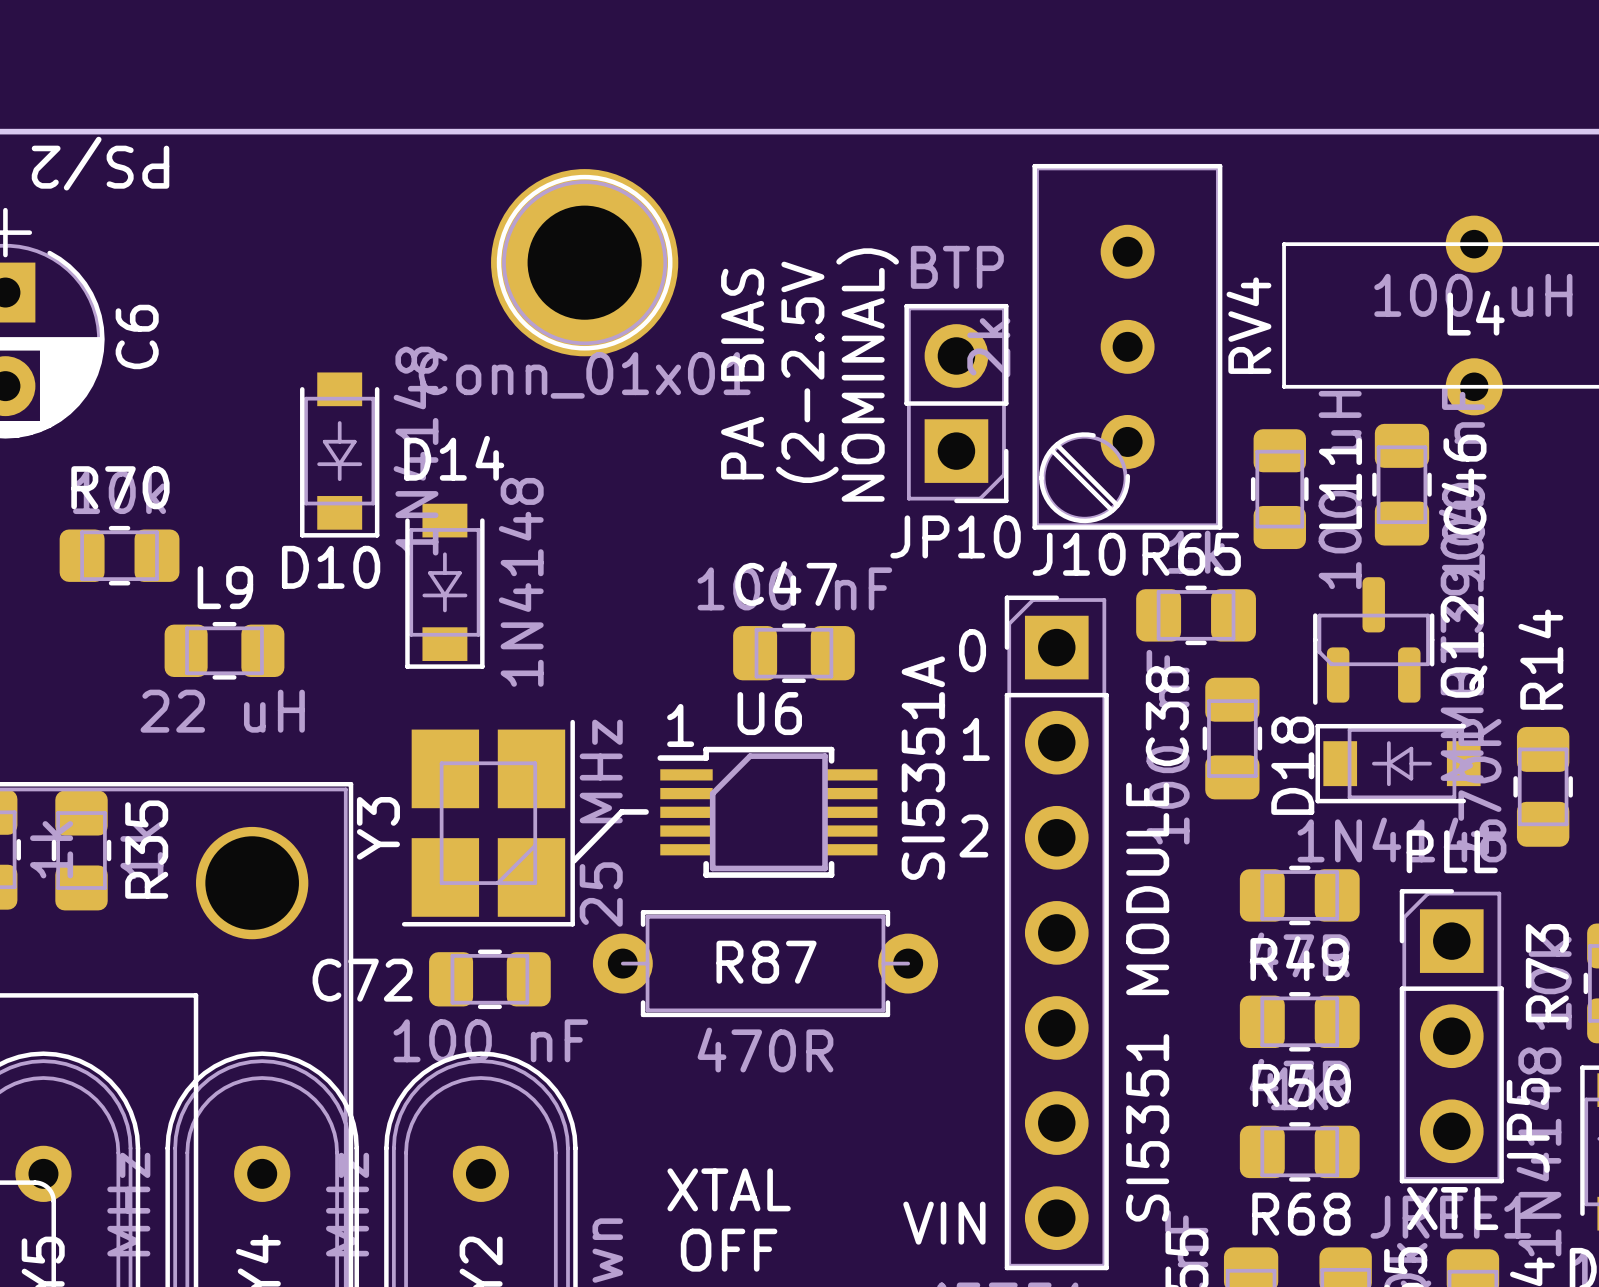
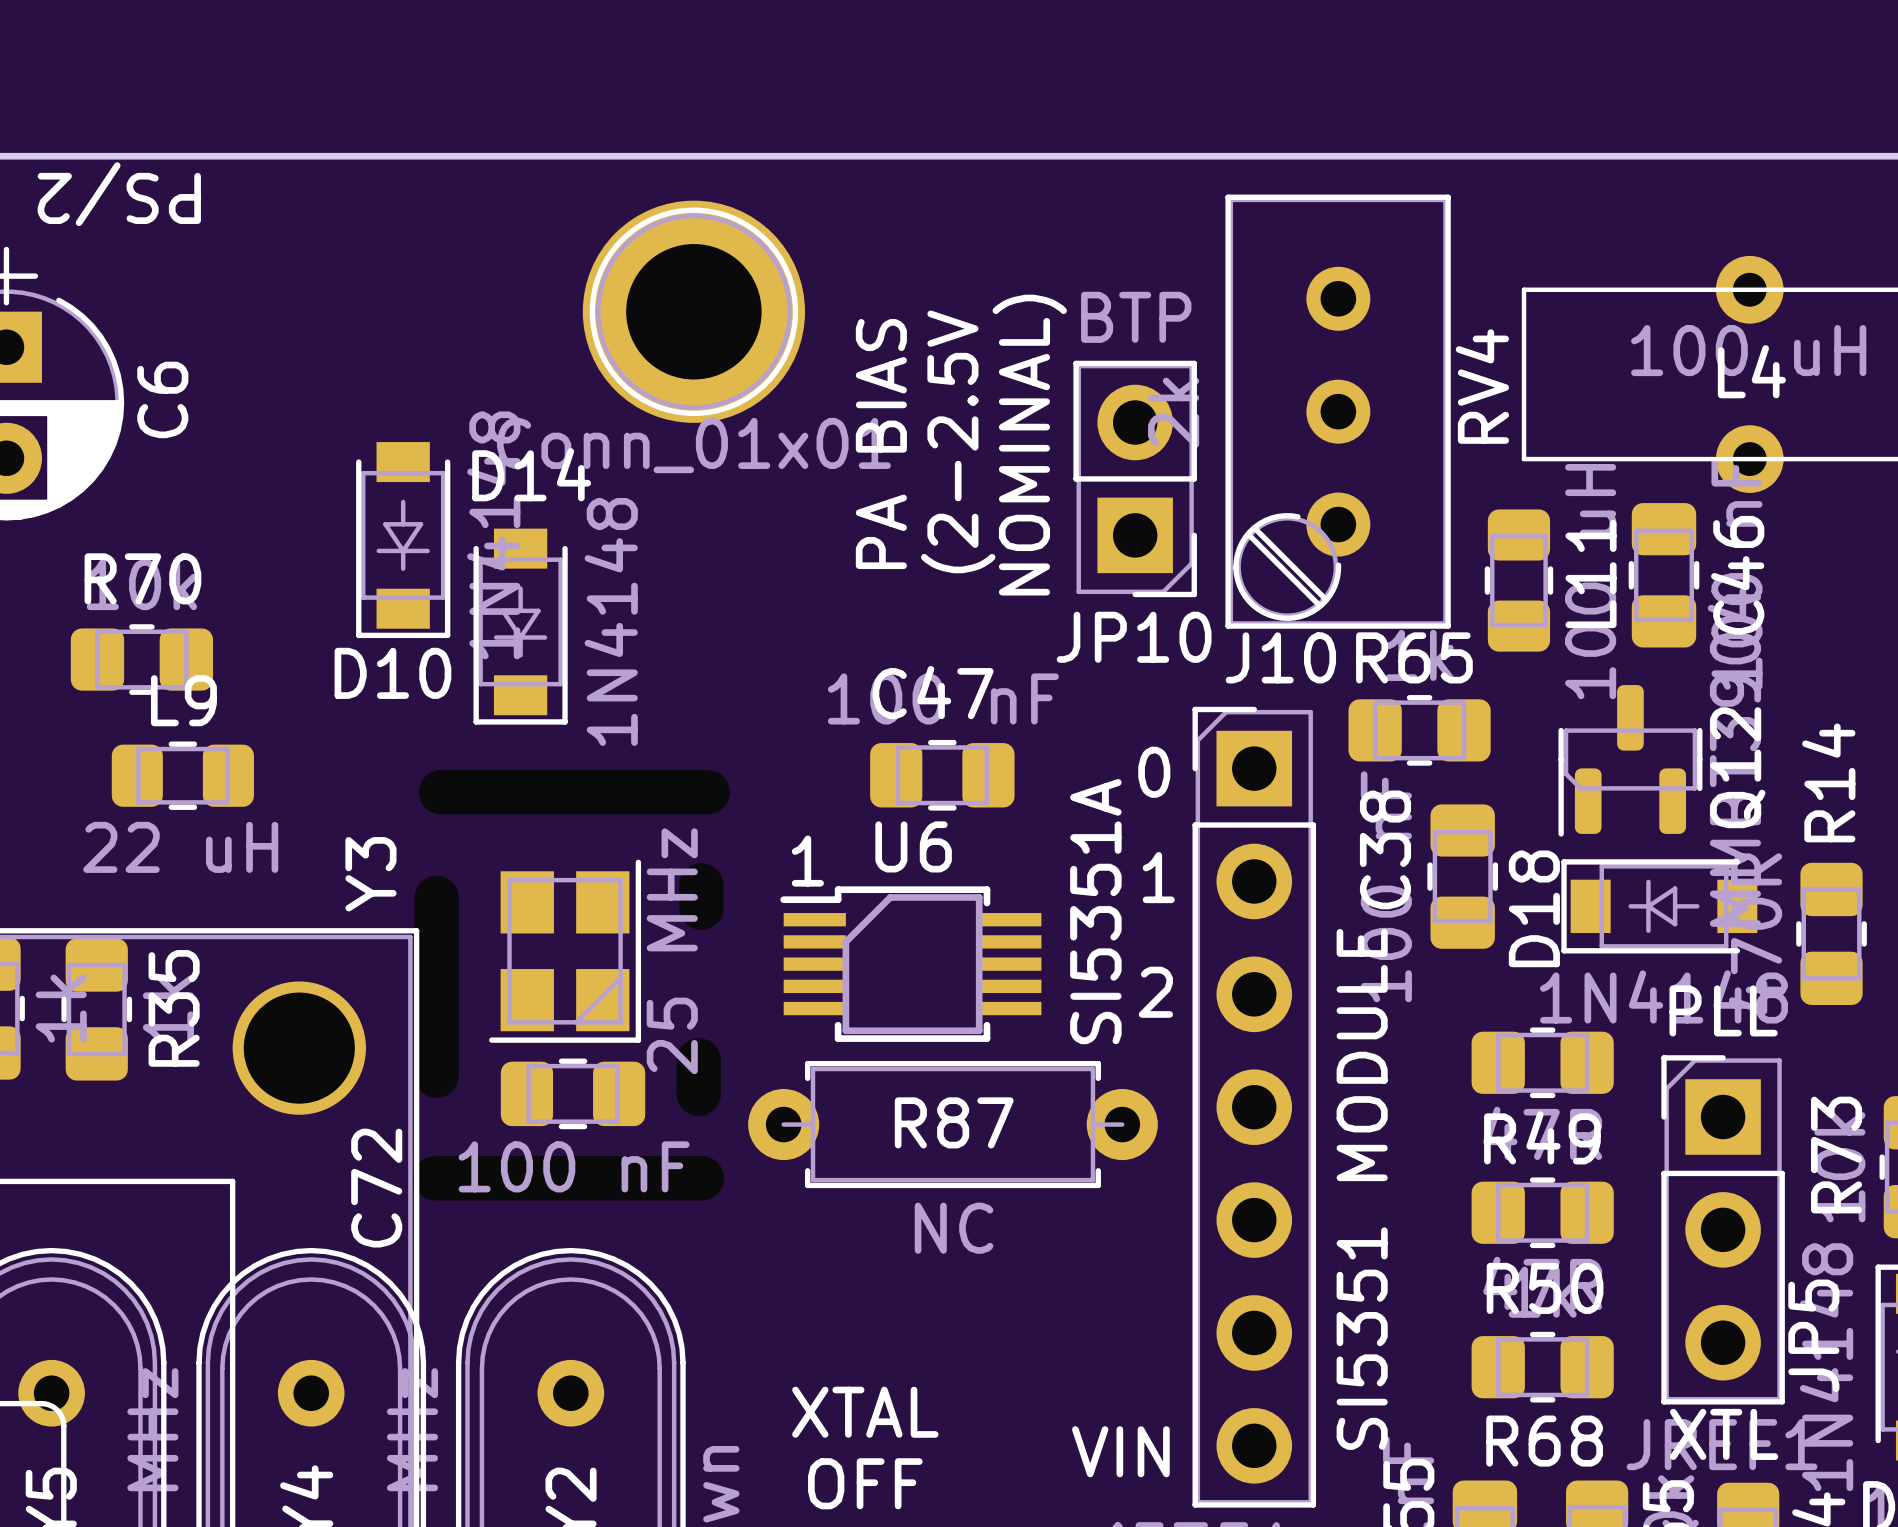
D14 position: (444, 586) -> (520, 626)
L9 position: (224, 650) -> (182, 775)
part: none -> (574, 792)
Y3 footprint: [401, 719, 575, 927] -> [489, 859, 642, 1043]
part: none -> (701, 896)
line: (646, 811) (621, 811) (573, 860) -> none
Y3 name position: Y3 (378, 828) -> Y3 (370, 874)
part: none -> (436, 986)
part: none -> (698, 1077)
R87 position: (765, 963) -> (952, 1124)
C72 position: (489, 979) -> (573, 1093)
C72 name rotation: 0° (362, 980) -> 90° counterclockwise (376, 1188)
part: none -> (568, 1178)
R87 value: 470R (765, 1050) -> NC (954, 1228)

